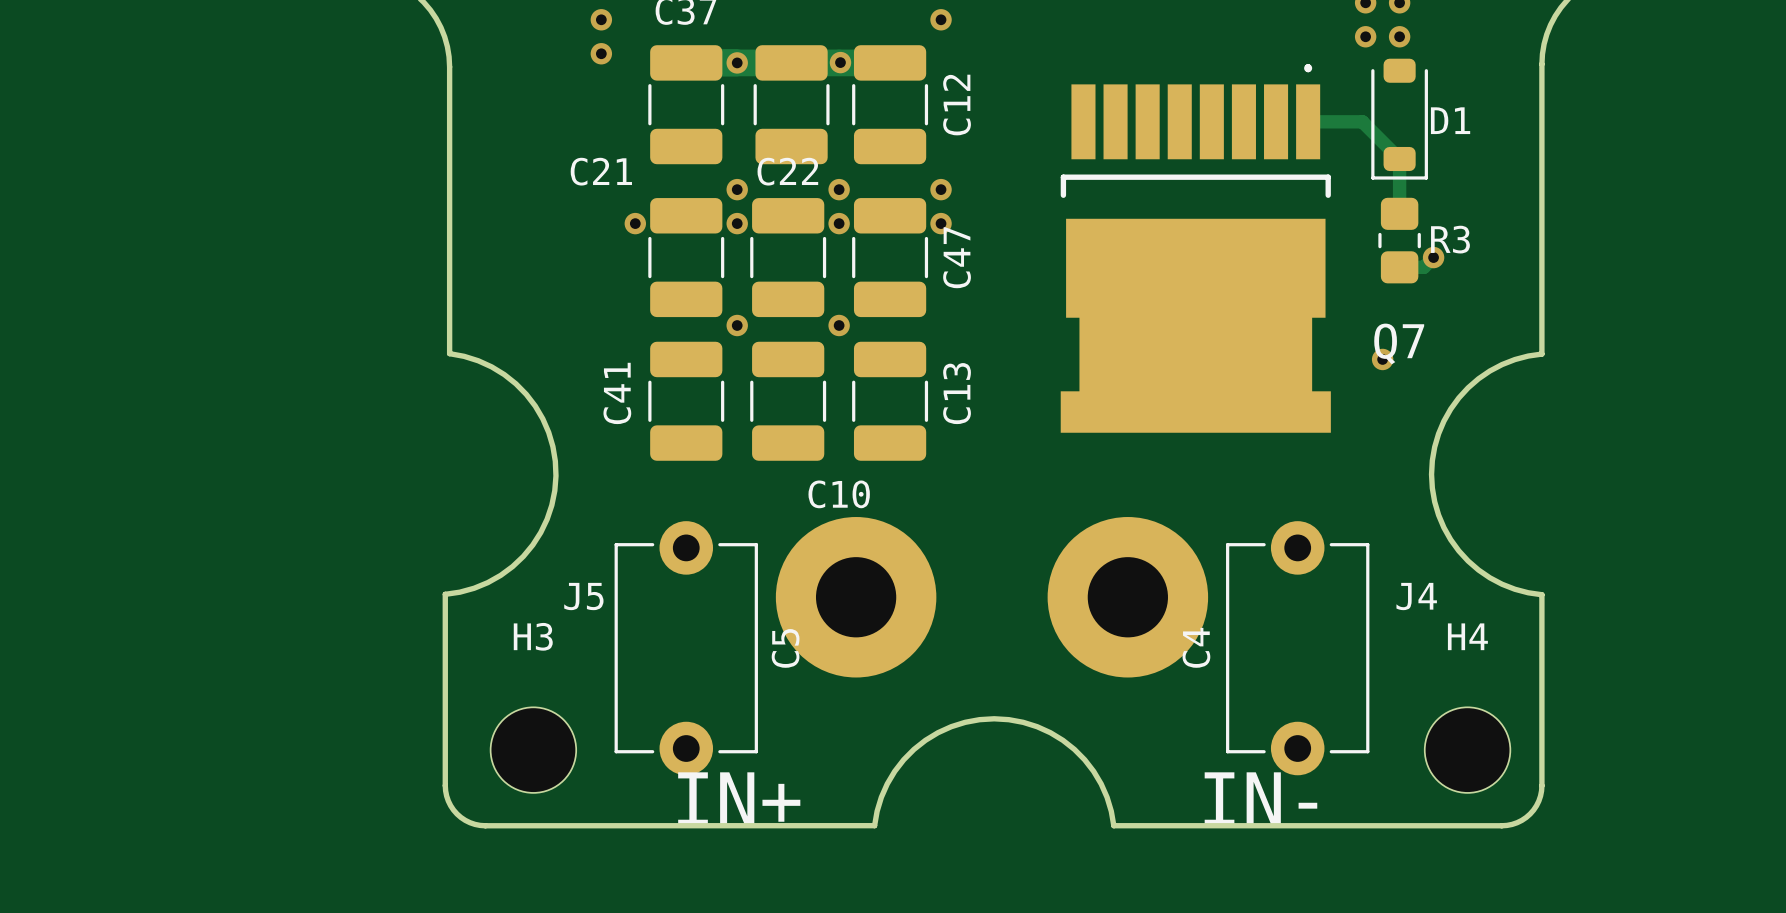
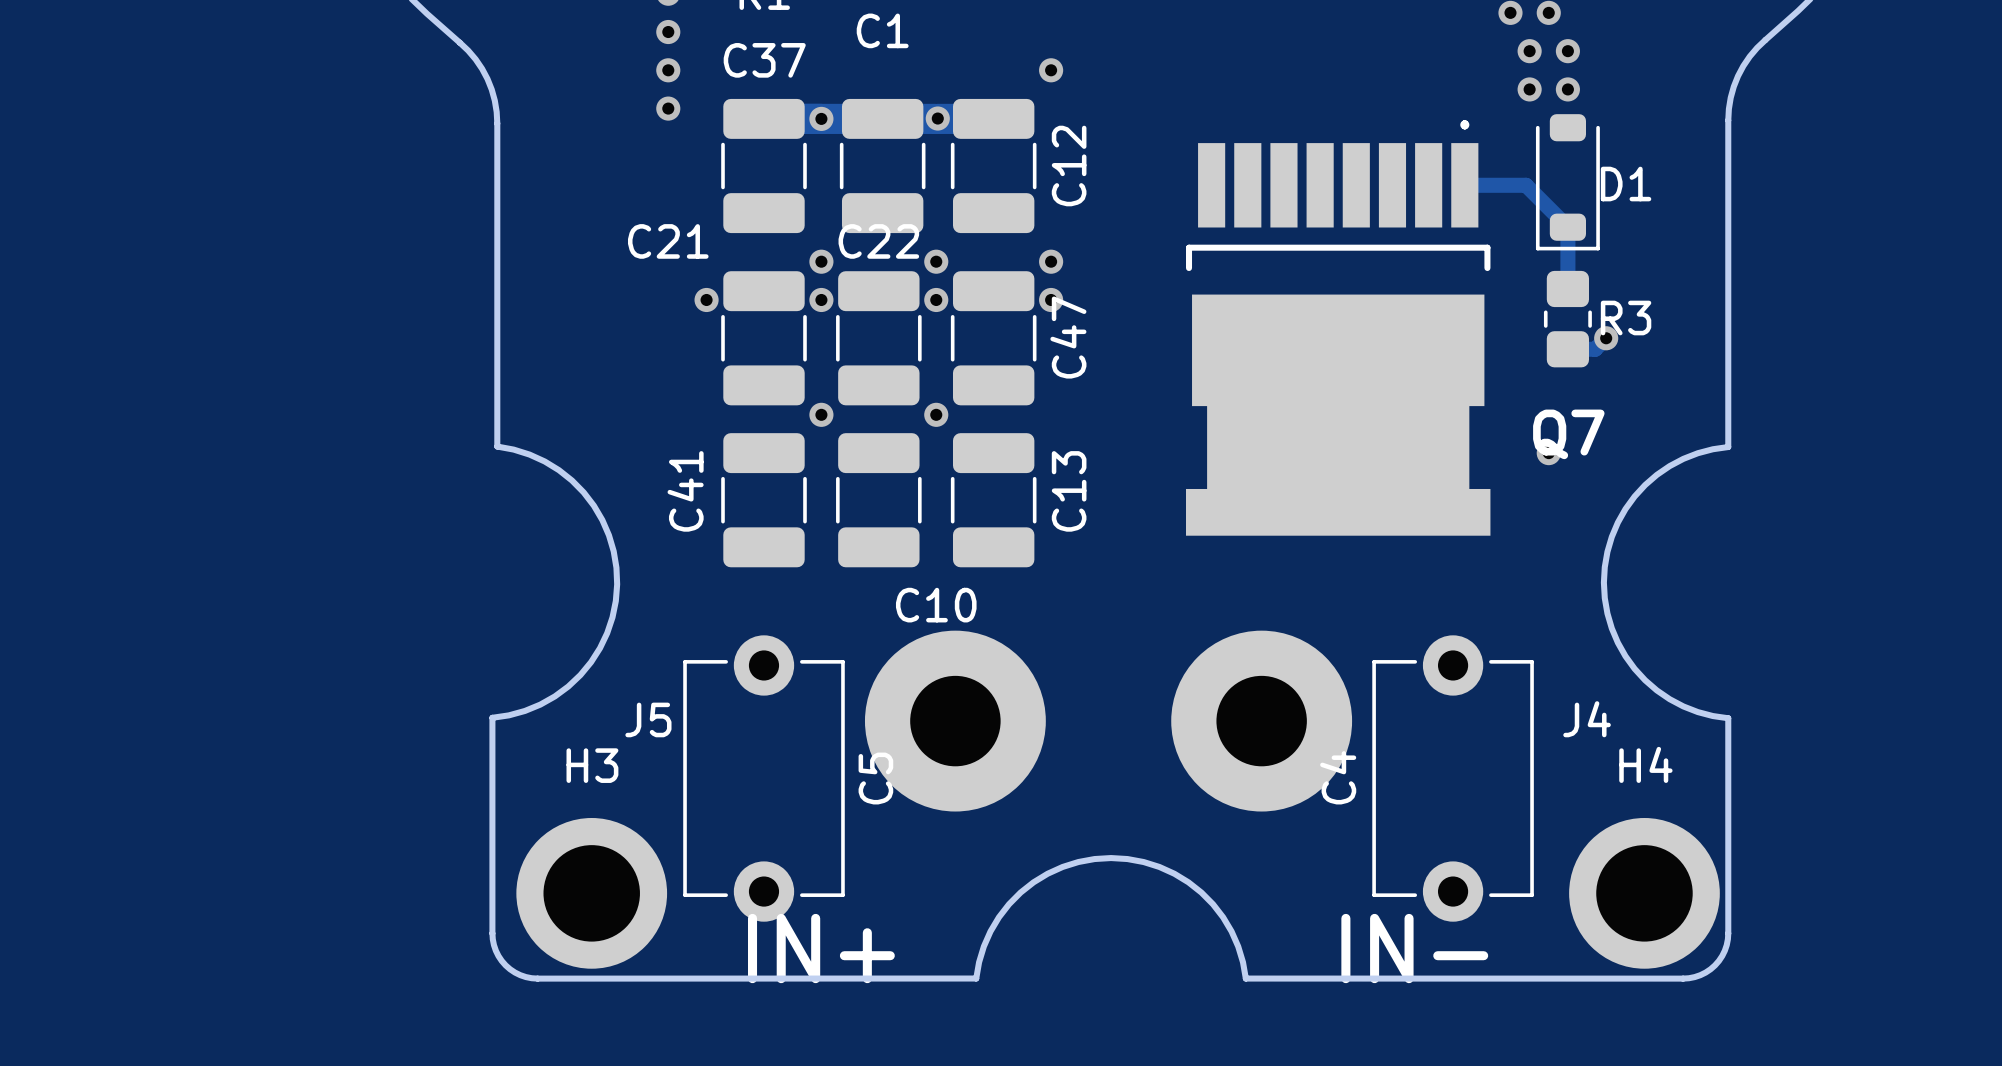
H3 footprint: [490, 707, 577, 793] -> [516, 818, 668, 969]
H4 footprint: [1424, 707, 1511, 793] -> [1569, 818, 1720, 969]

